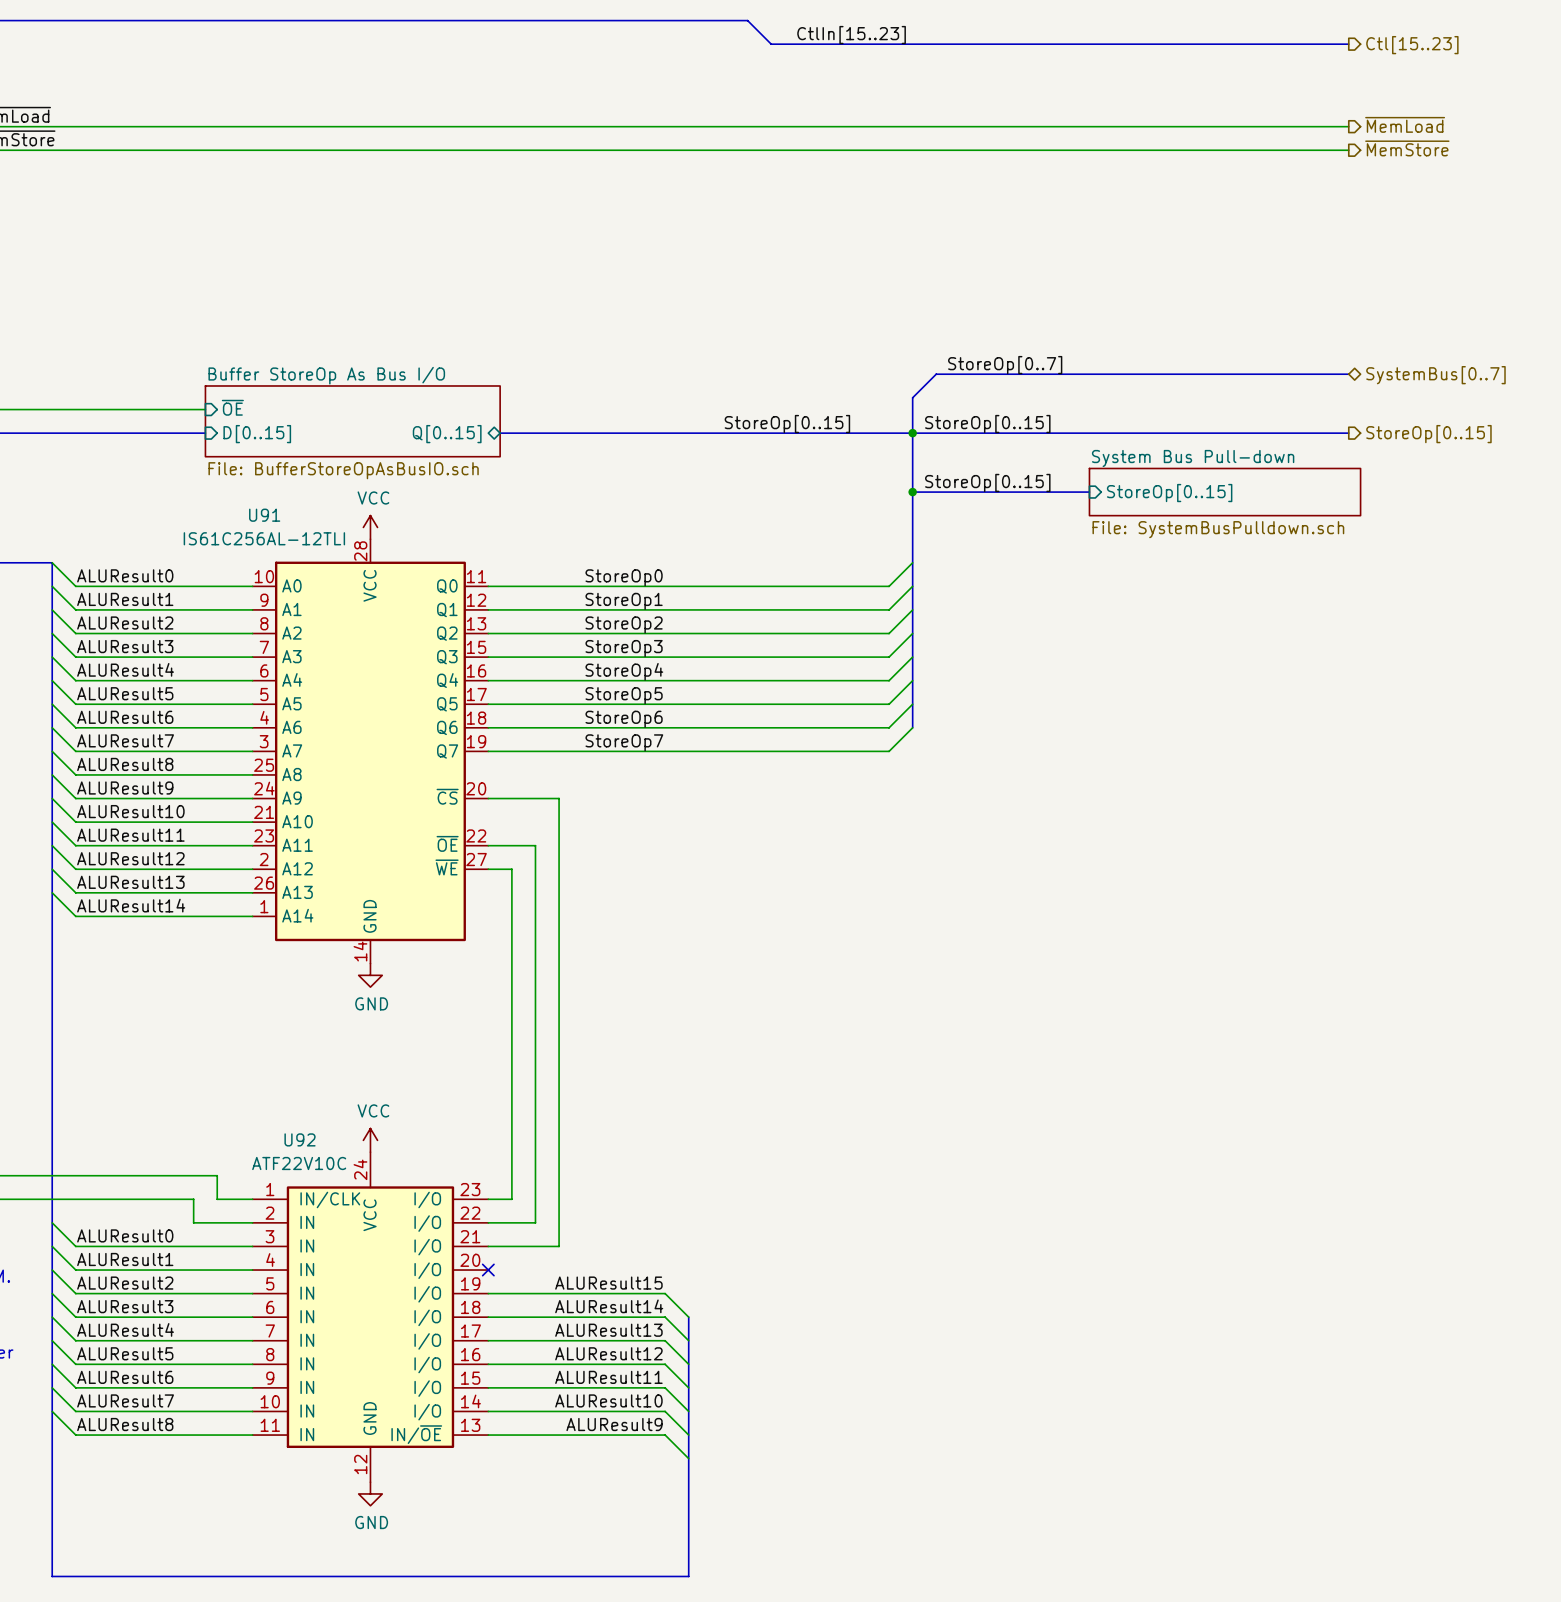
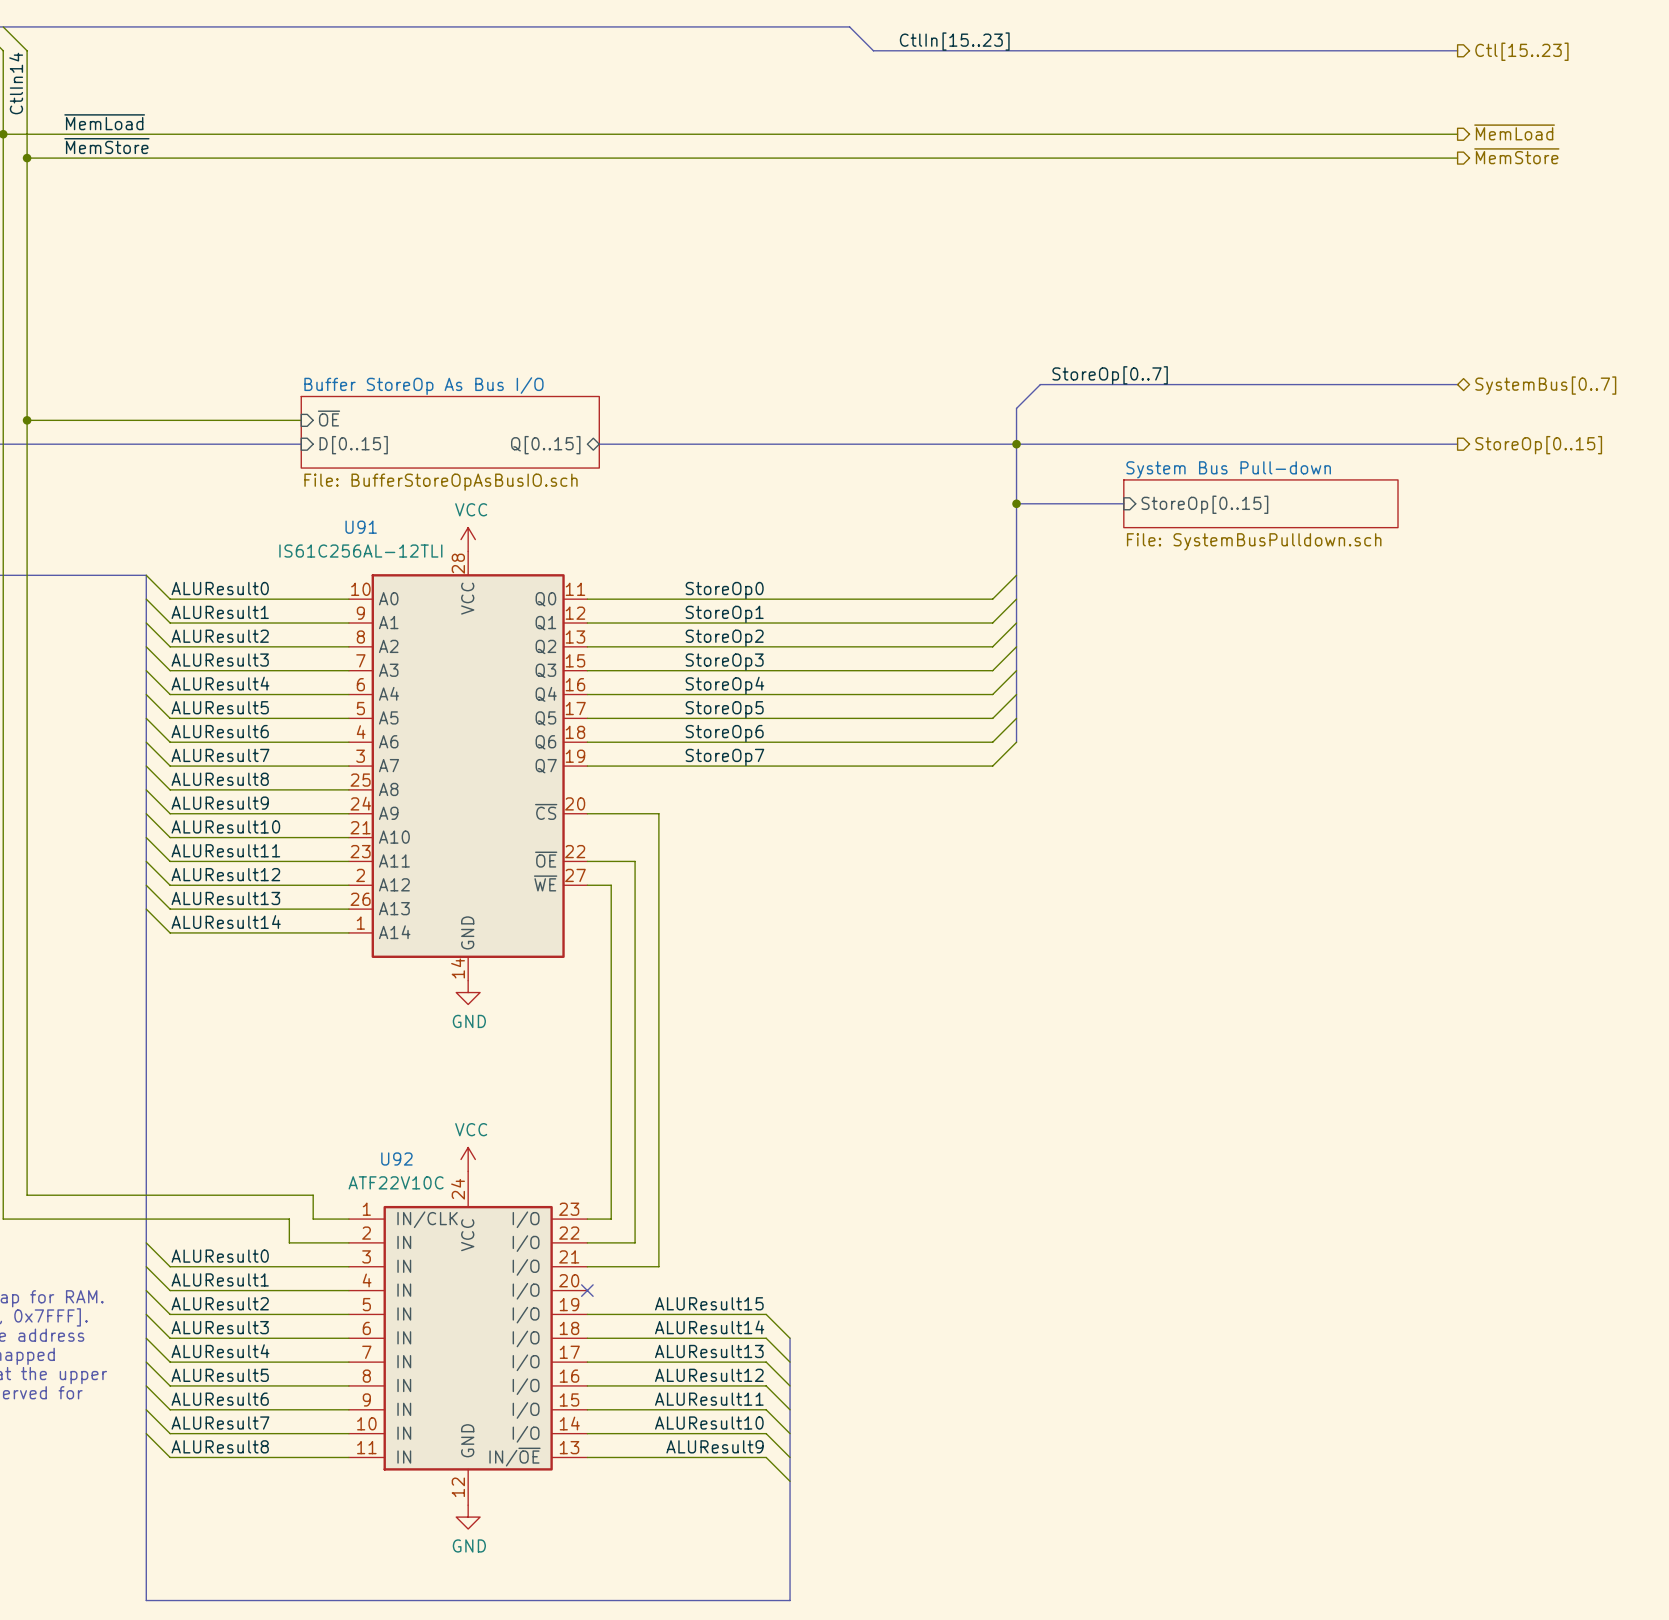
label: StoreOp[0..15] (787, 424) -> none
label: StoreOp[0..15] (987, 424) -> none
label: StoreOp[0..15] (987, 482) -> none
bus: (1018, 492) (1089, 492) -> none
sheet System Bus Pull-down position: (1225, 492) -> (1260, 503)
sheet pin position: StoreOp[0..15] (1169, 493) -> StoreOp[0..15] (1204, 504)

